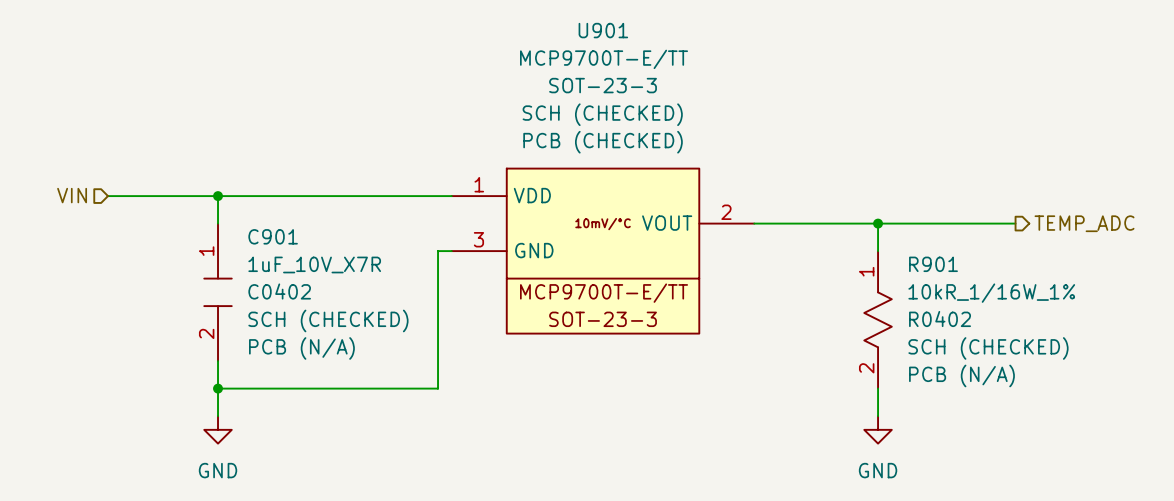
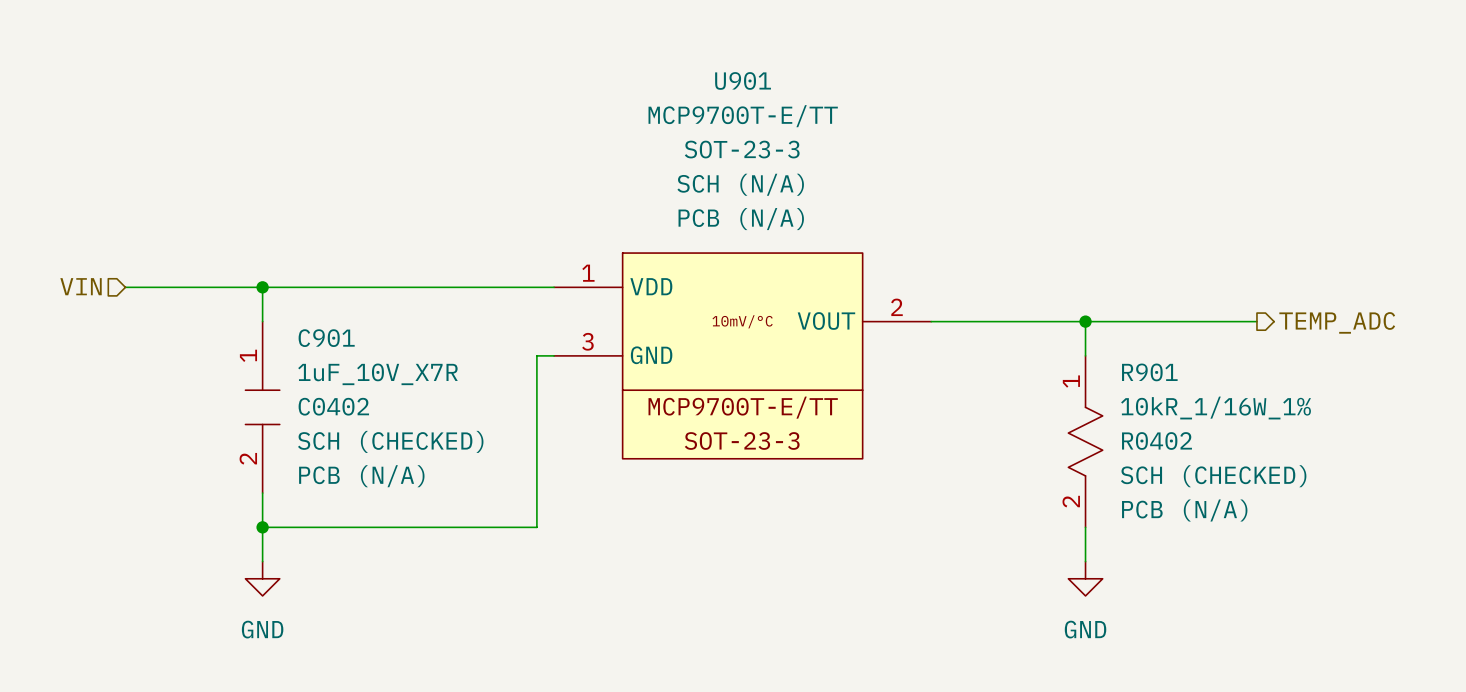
U901 text: SCH (CHECKED) (602, 114) -> SCH (N/A) (740, 184)
U901 text: PCB (CHECKED) (603, 142) -> PCB (N/A) (741, 219)

